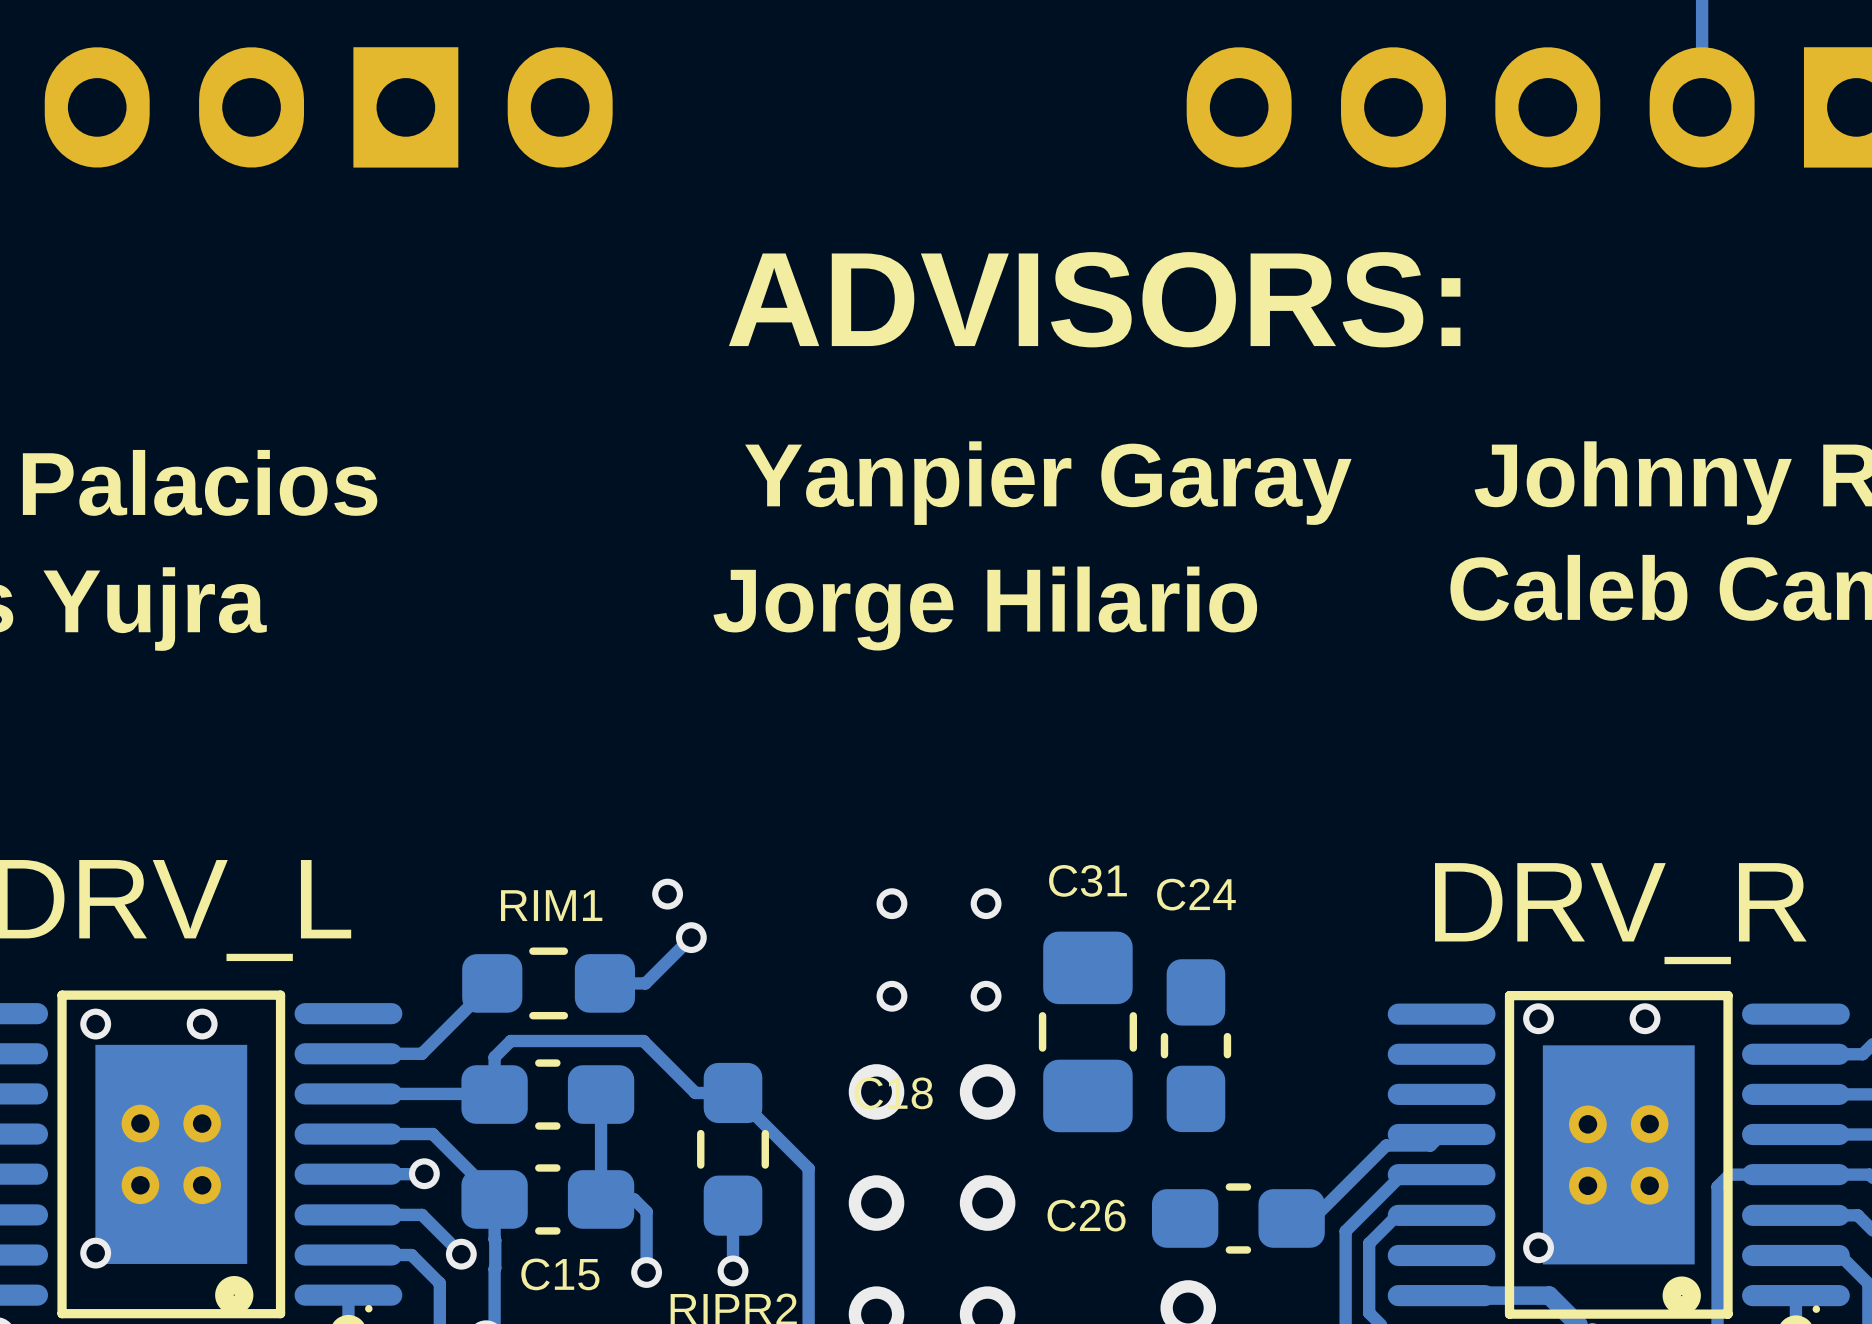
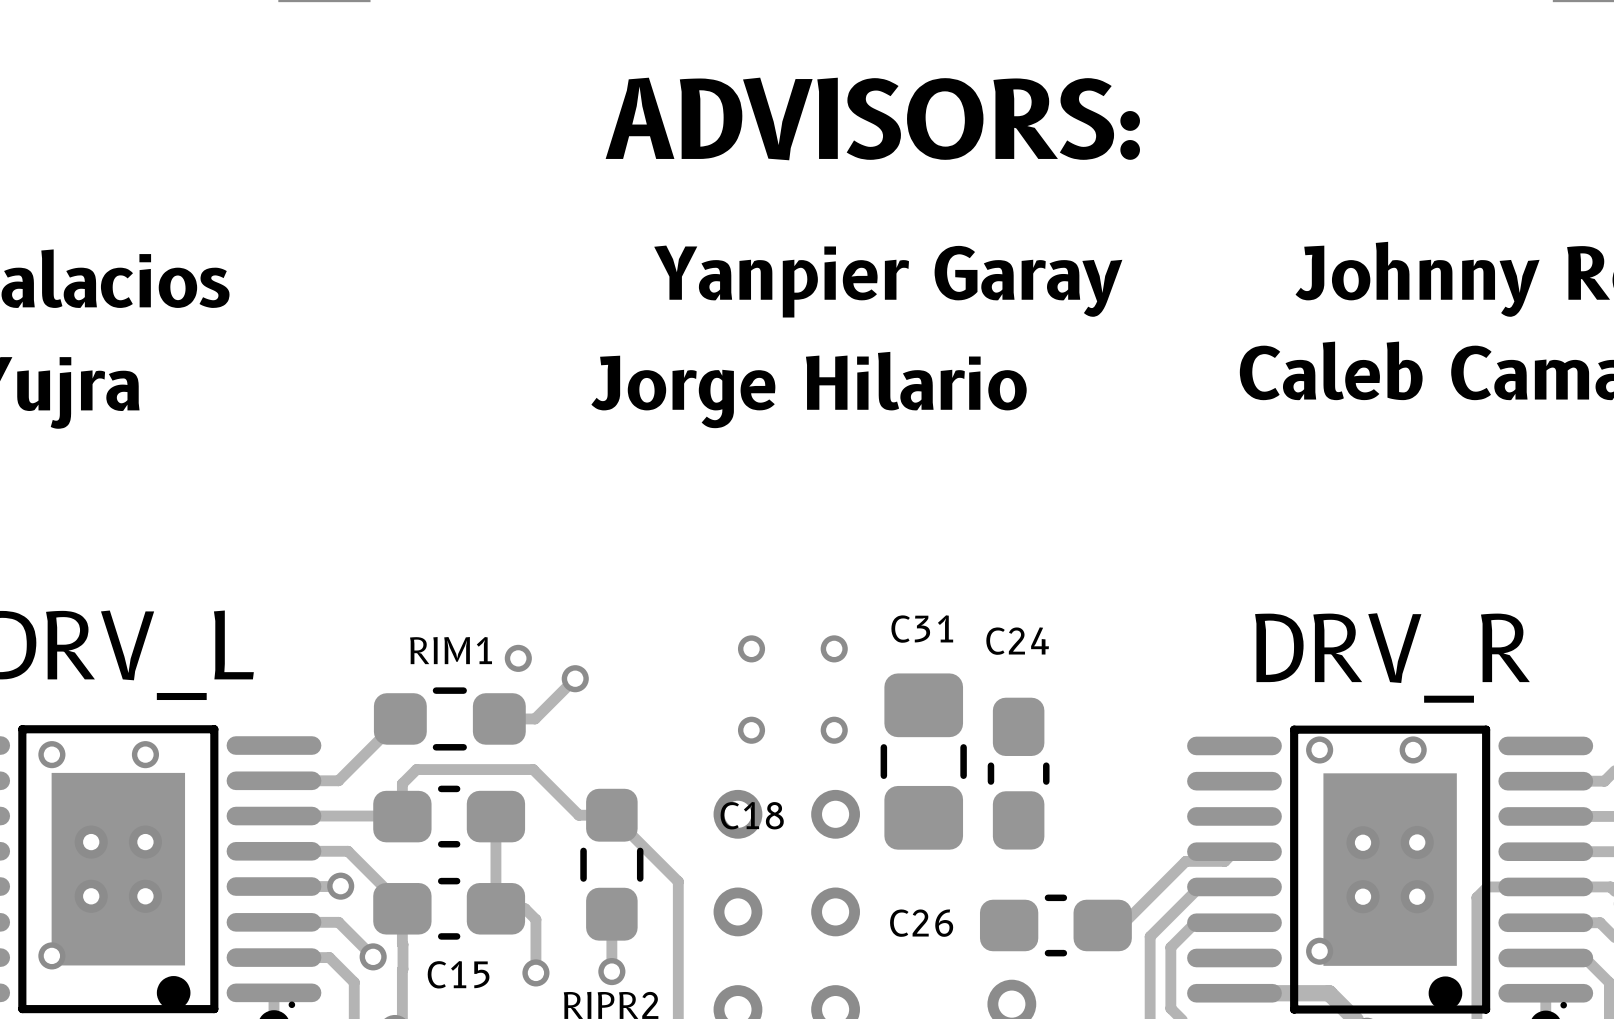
via position: (667, 894) -> (518, 658)

